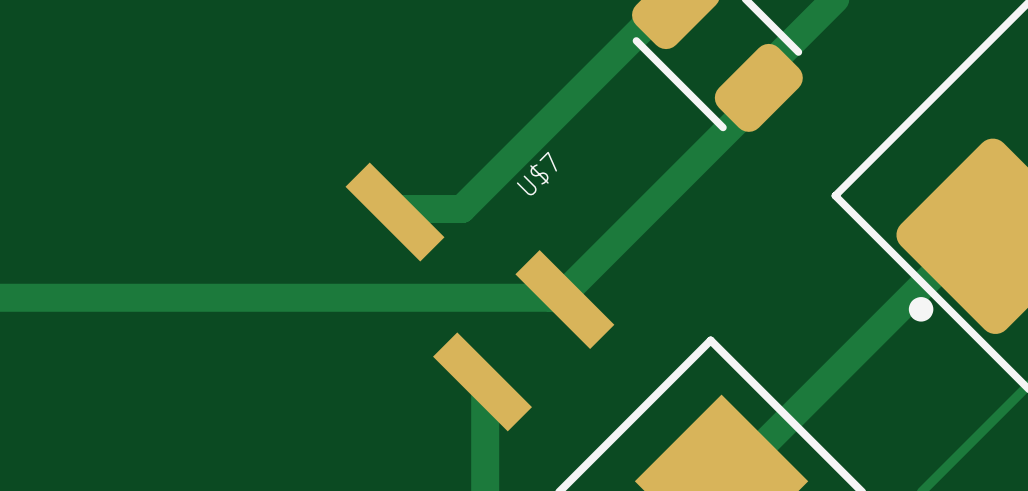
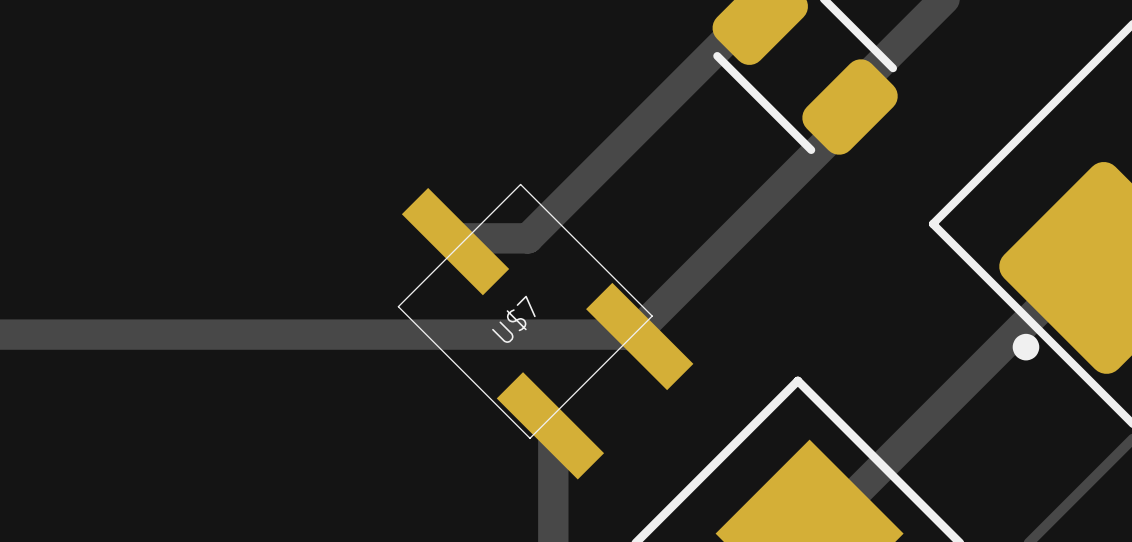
U$7 footprint: [345, 162, 615, 432] -> [398, 184, 694, 480]
U$7 name position: U$7 (536, 173) -> U$7 (513, 319)

